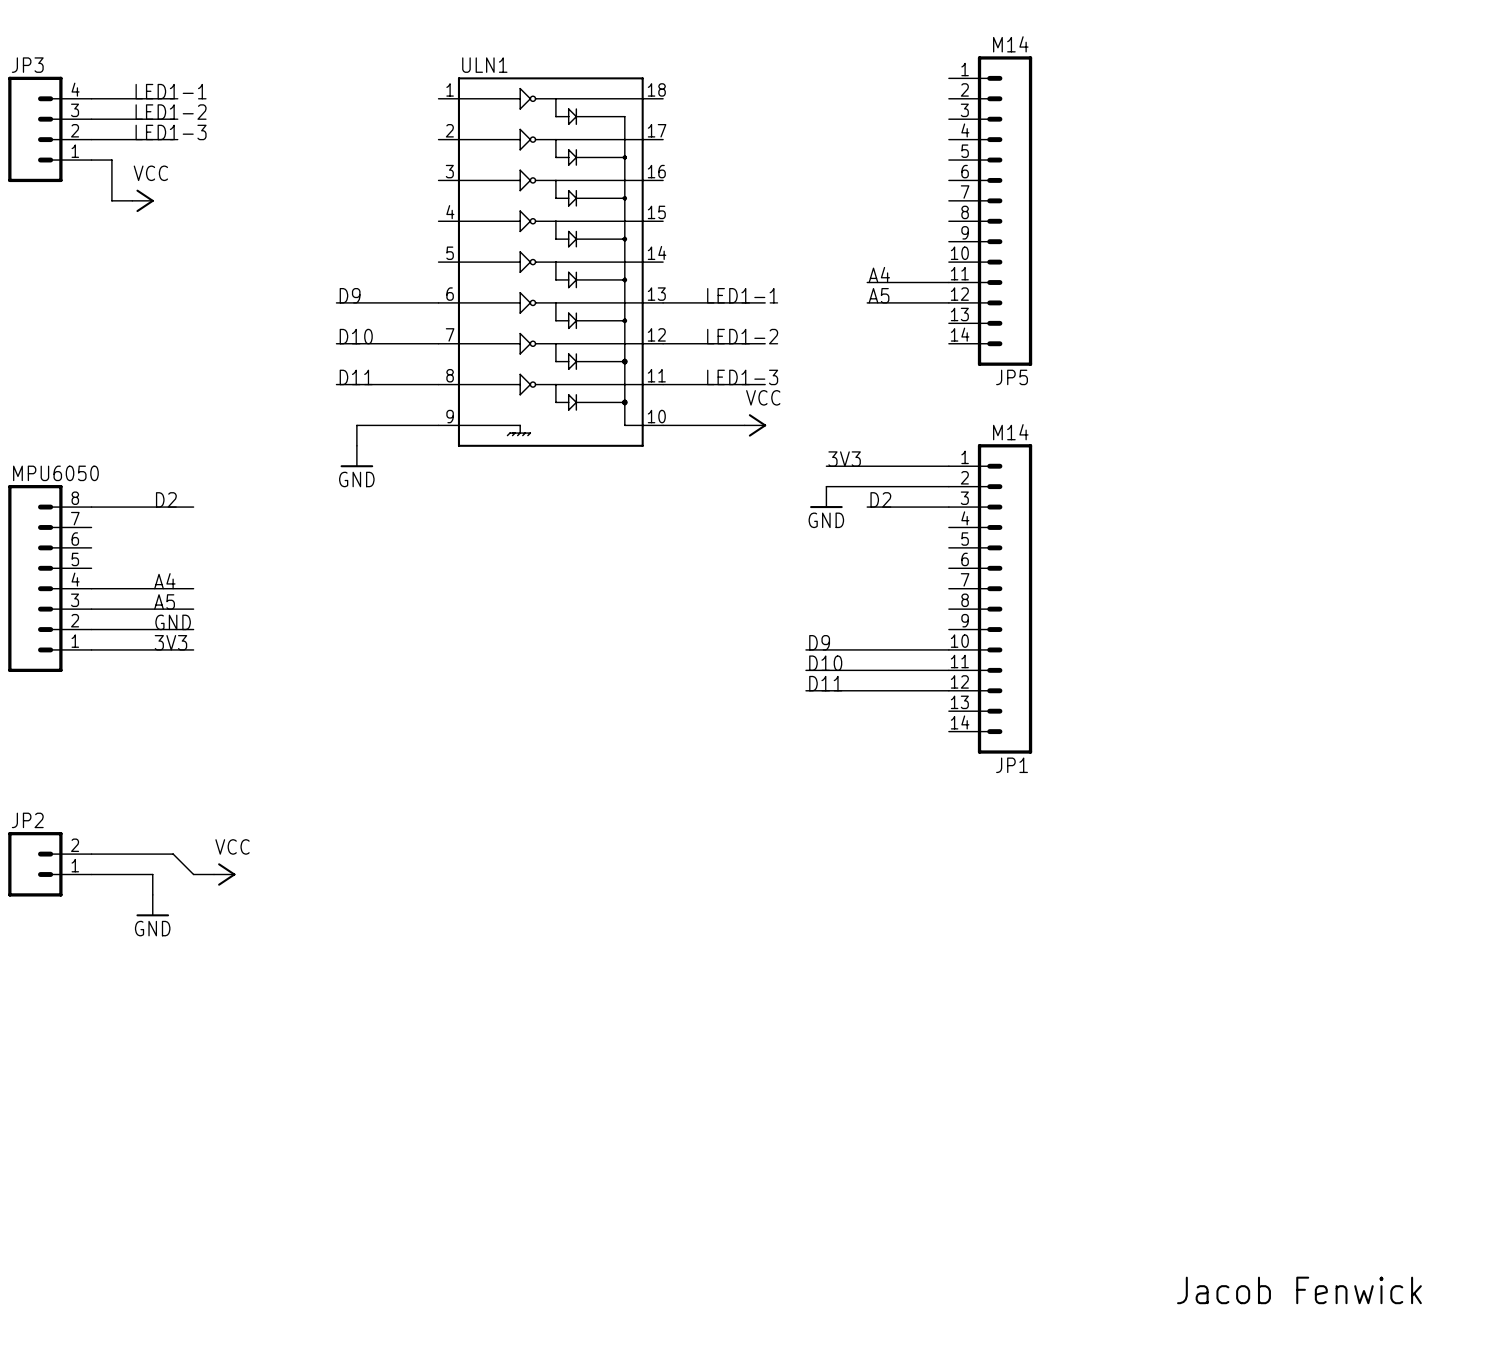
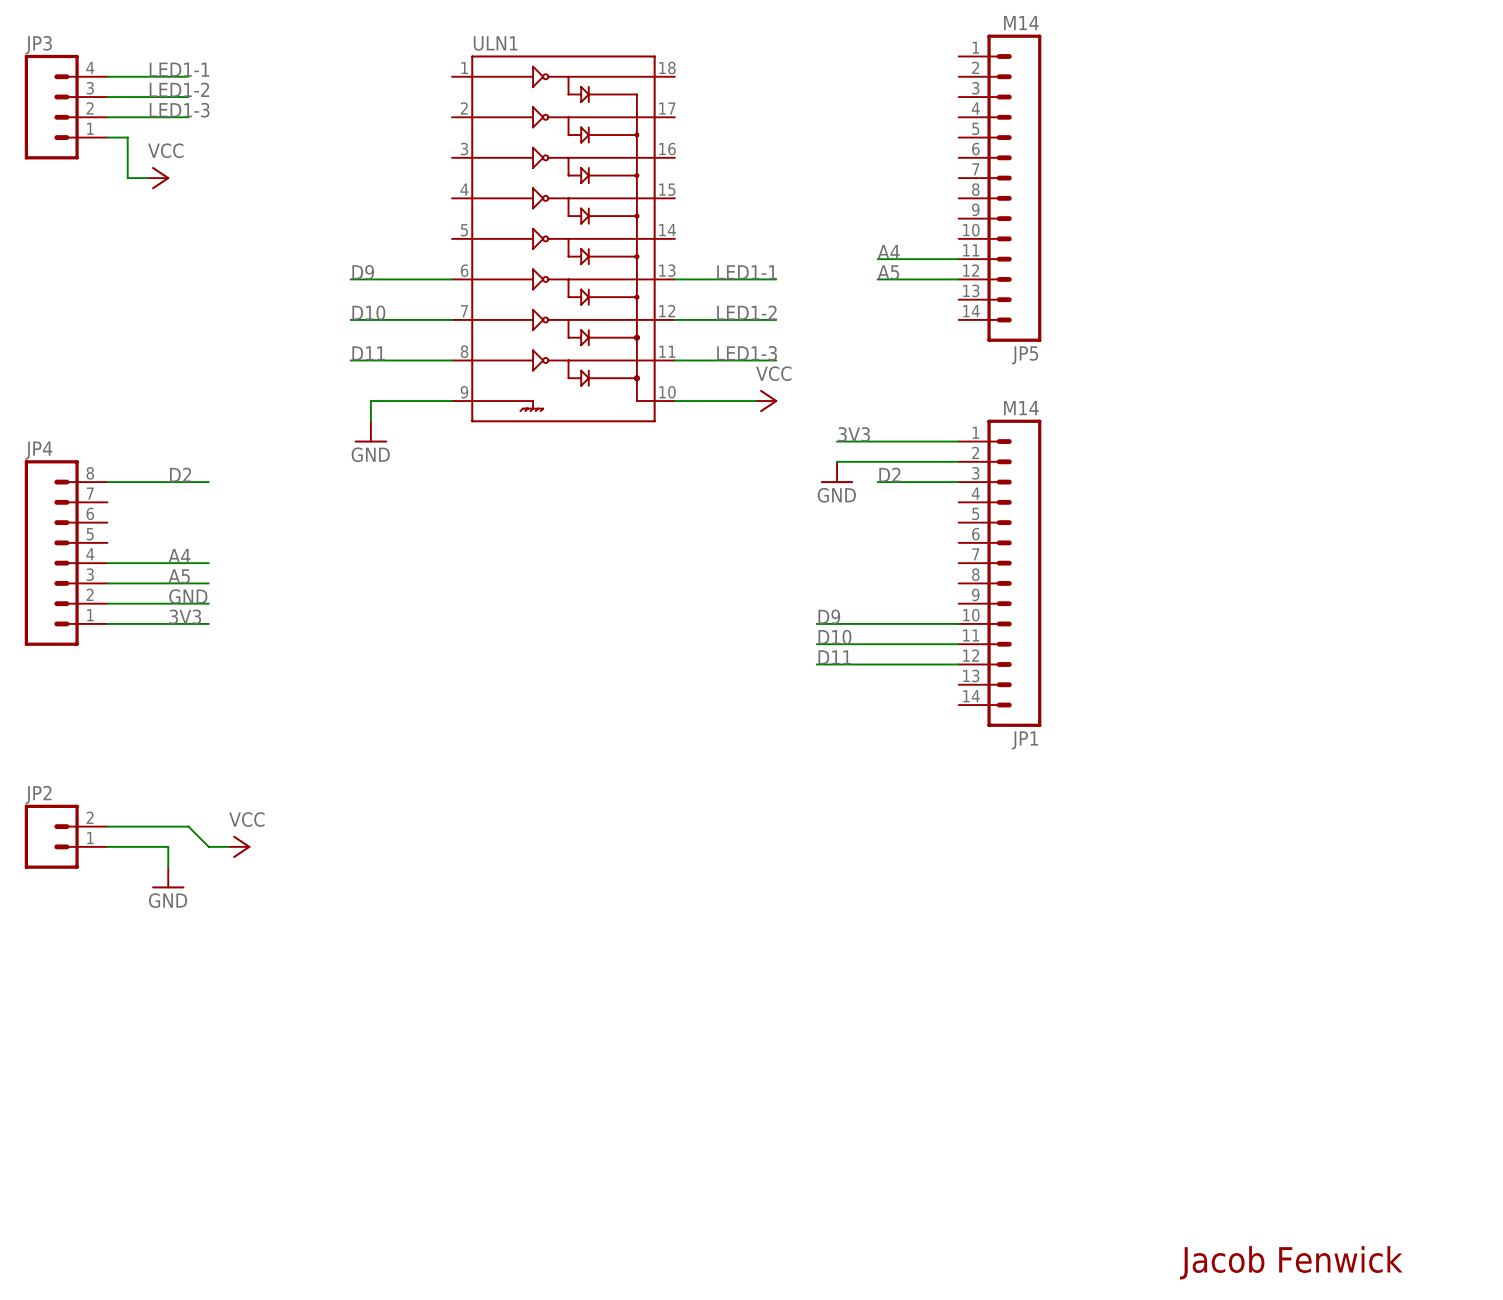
MPU6050 name: MPU6050 (55, 473) -> JP4 (38, 450)

